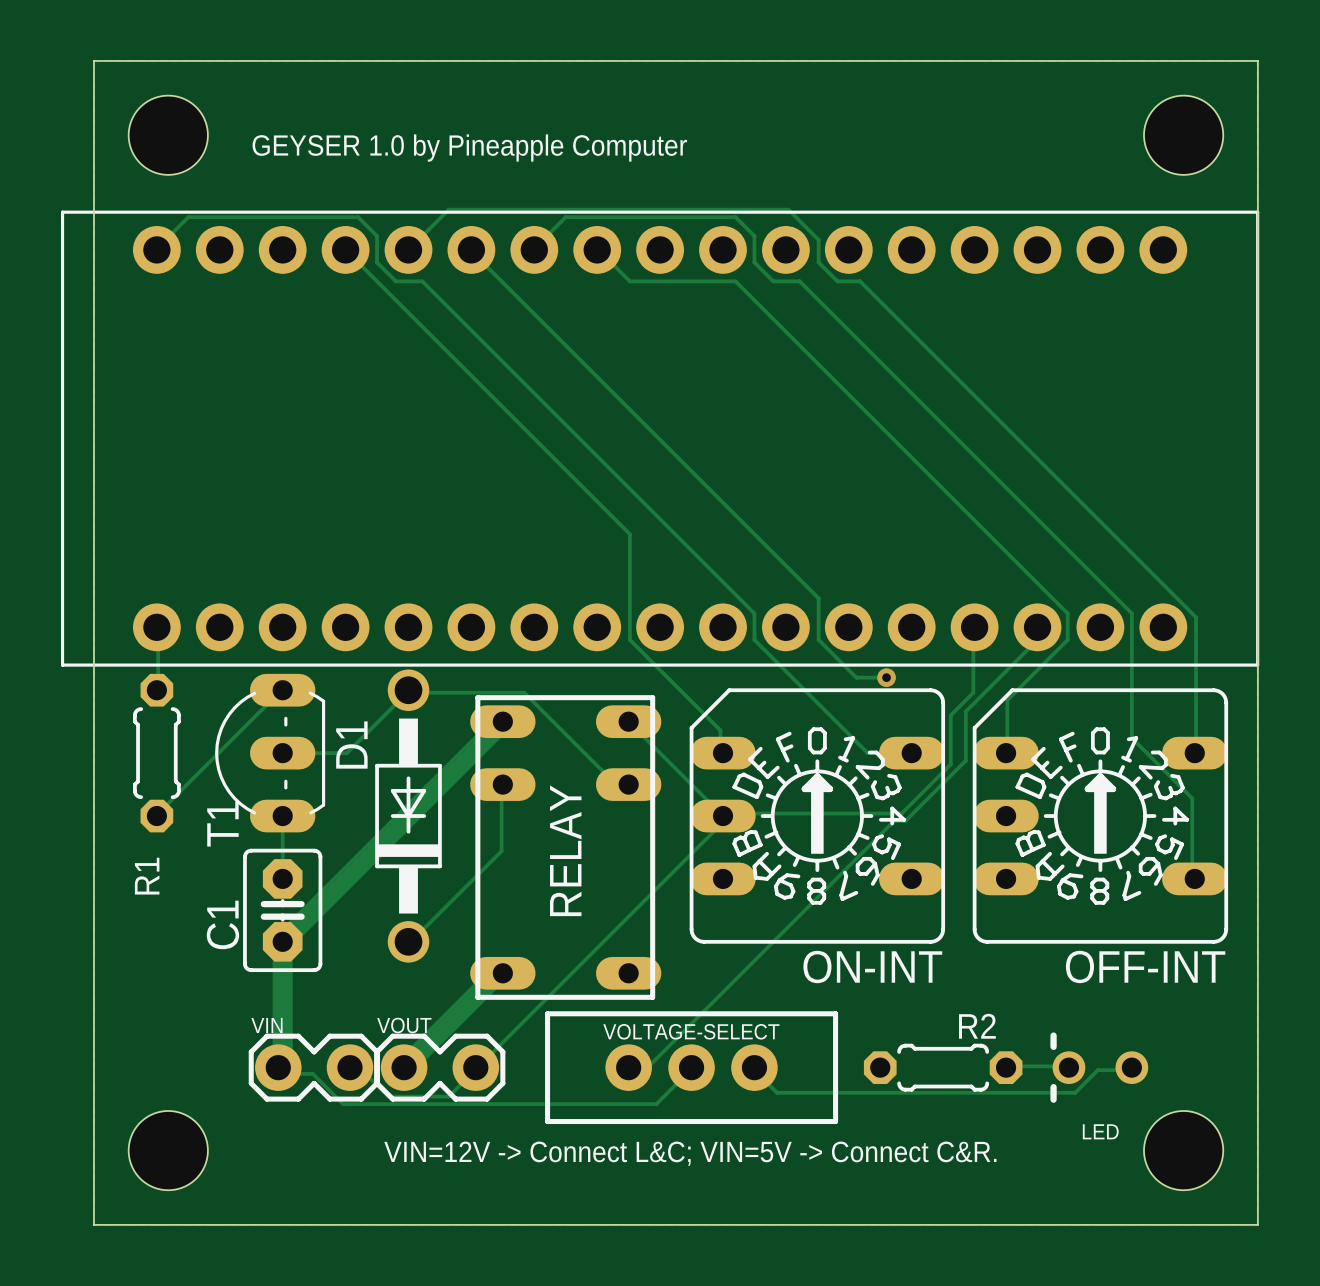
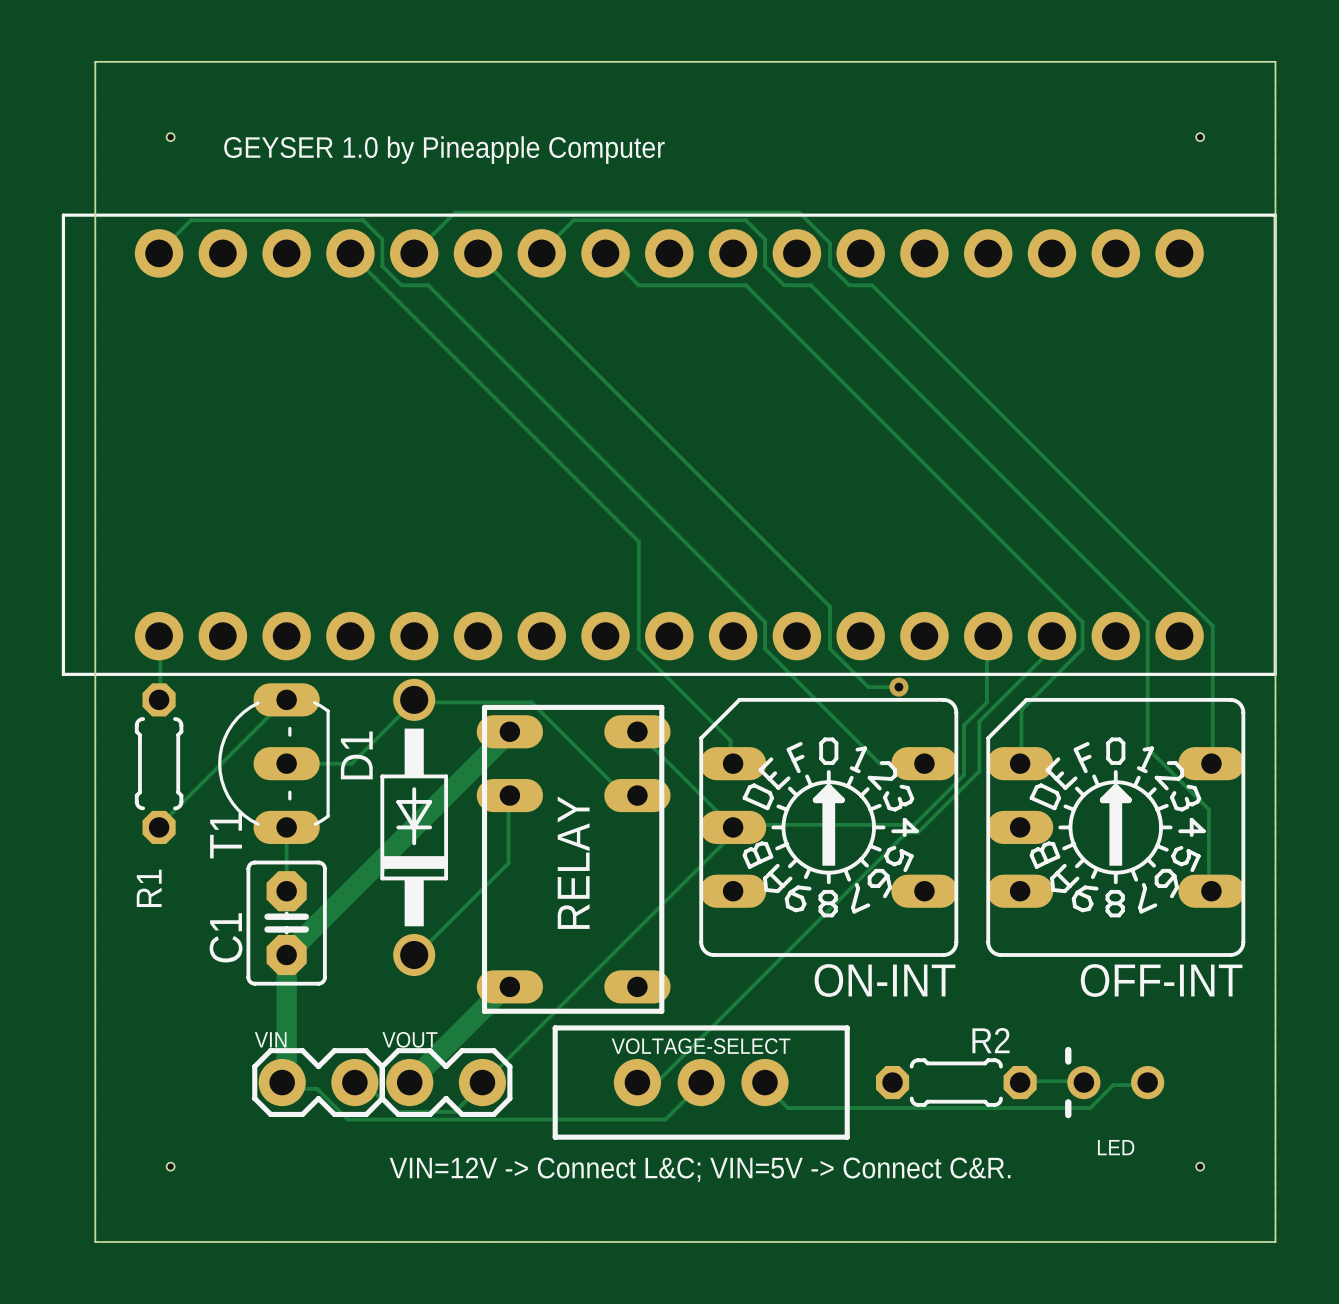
hole size: [128, 95, 208, 175] -> [166, 133, 175, 142]
hole size: [1144, 95, 1224, 175] -> [1196, 133, 1205, 142]
text position: GEYSER 1.0 by Pineapple Computer (469, 148) -> GEYSER 1.0 by Pineapple Computer (444, 150)
hole size: [128, 1110, 208, 1191] -> [166, 1162, 175, 1171]
hole size: [1144, 1110, 1224, 1191] -> [1196, 1162, 1205, 1171]

